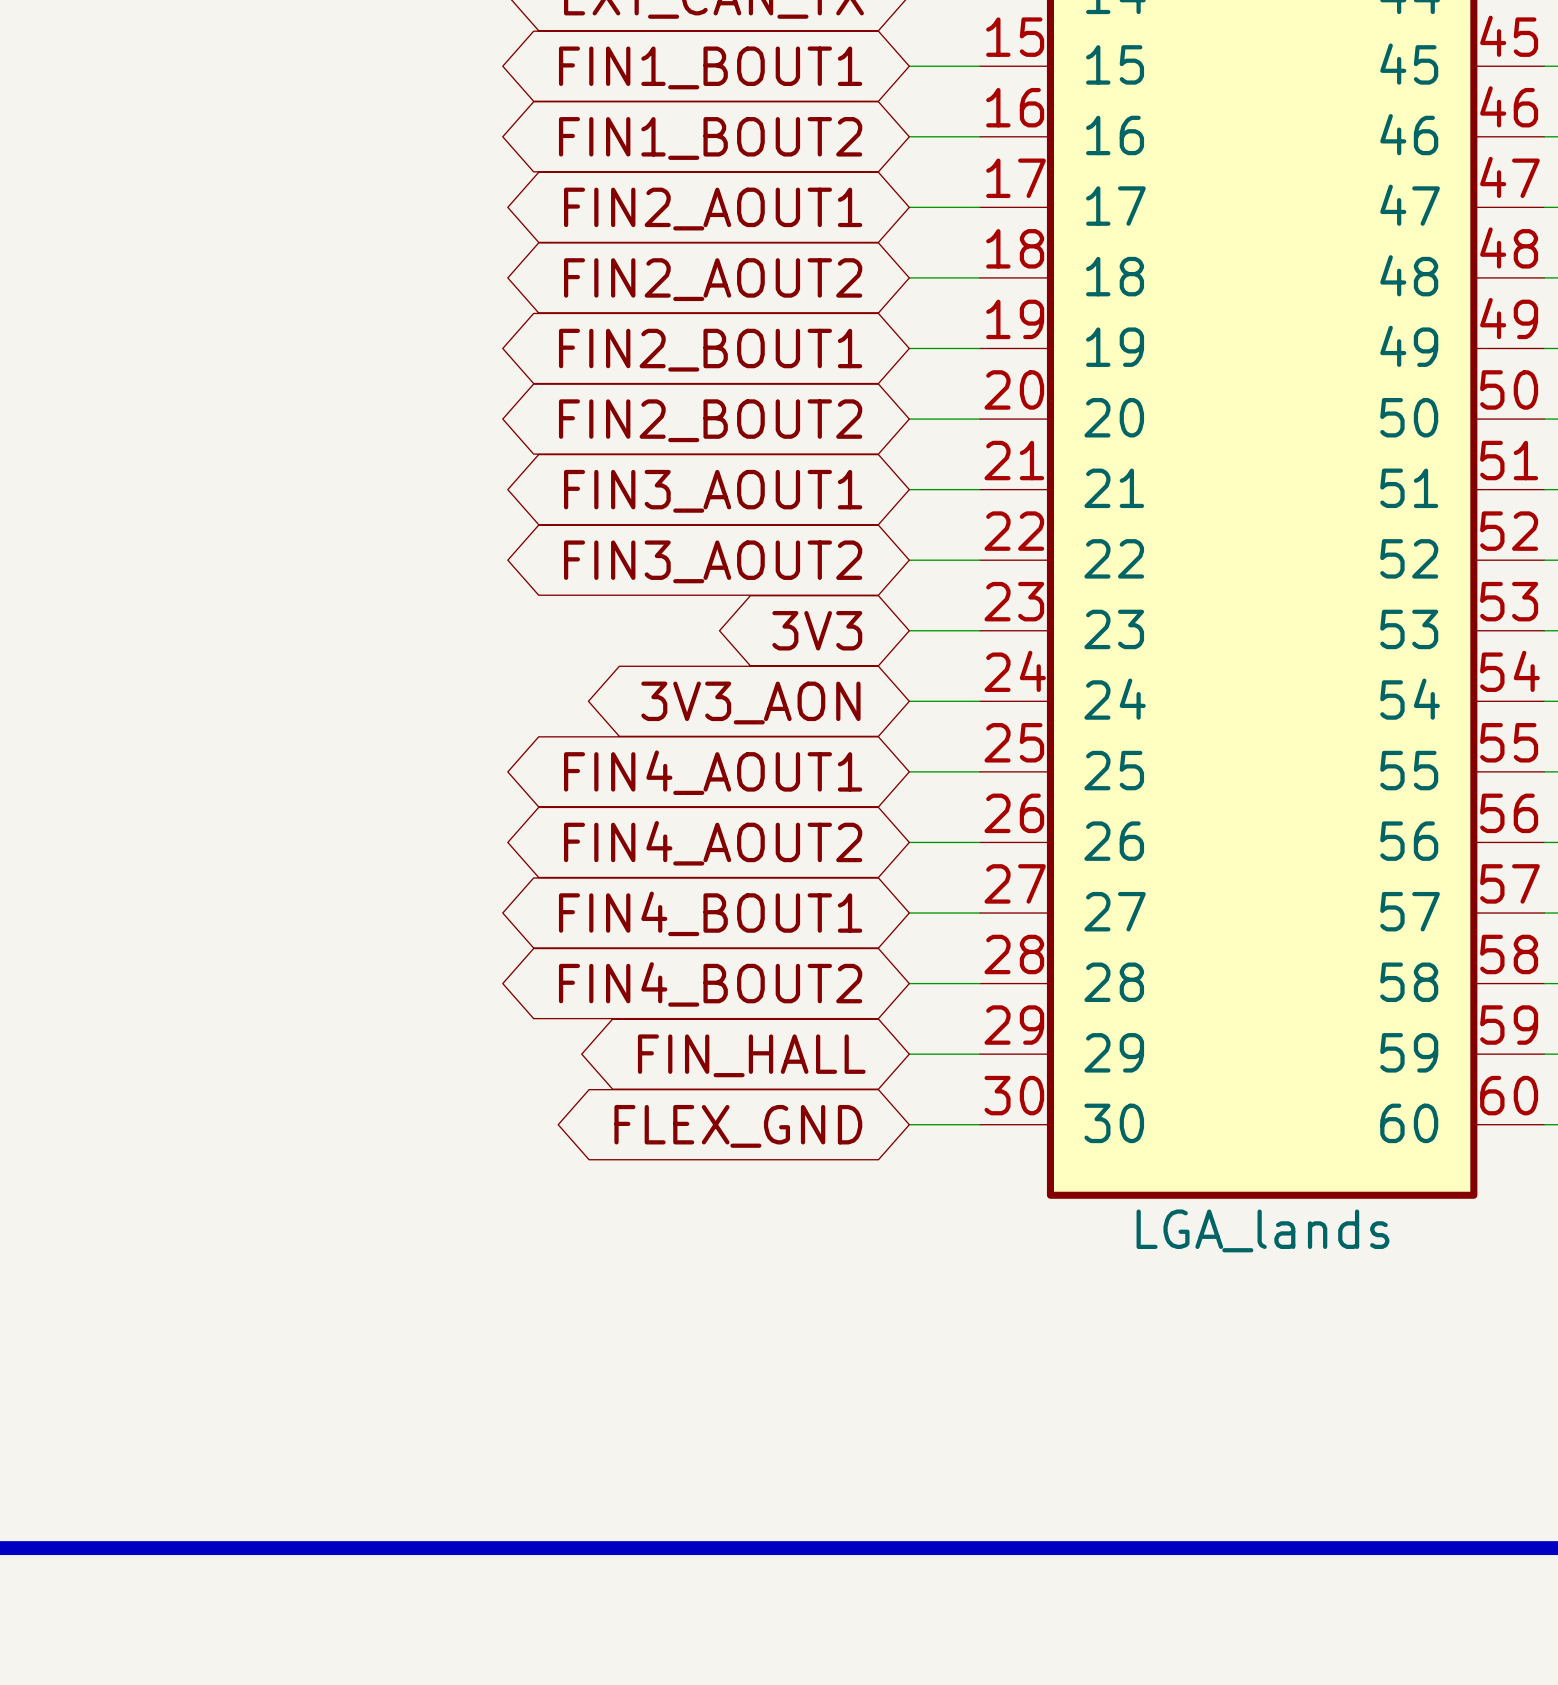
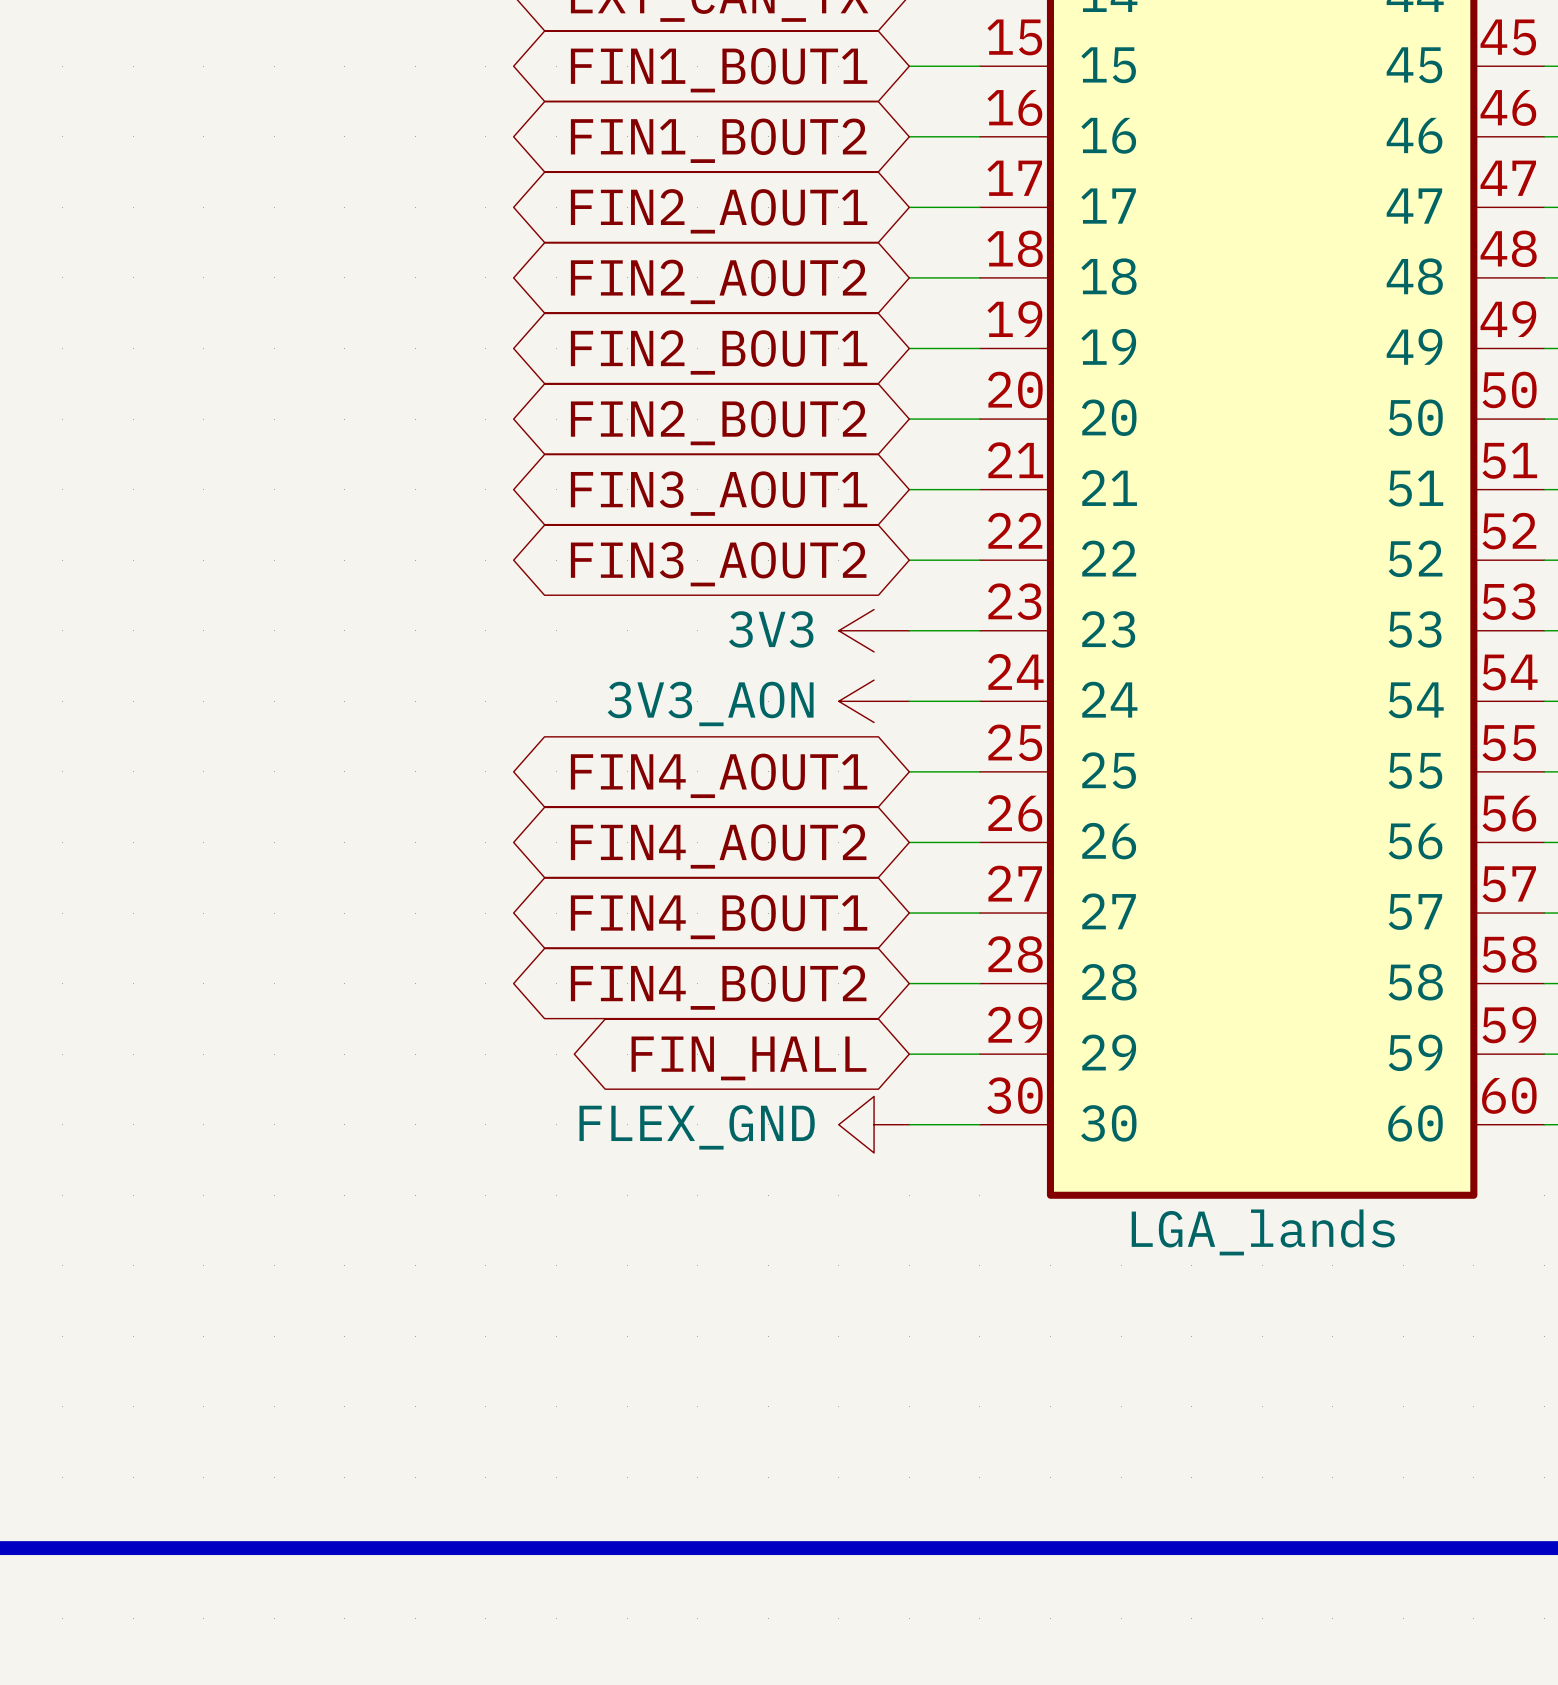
global label: 3V3 (817, 630) -> none
power symbol: none -> 3V3 (874, 630)
power symbol: none -> 3V3_AON (874, 701)
global label: 3V3_AON (750, 703) -> none
power symbol: none -> FLEX_GND (874, 1124)
global label: FLEX_GND (738, 1126) -> none

